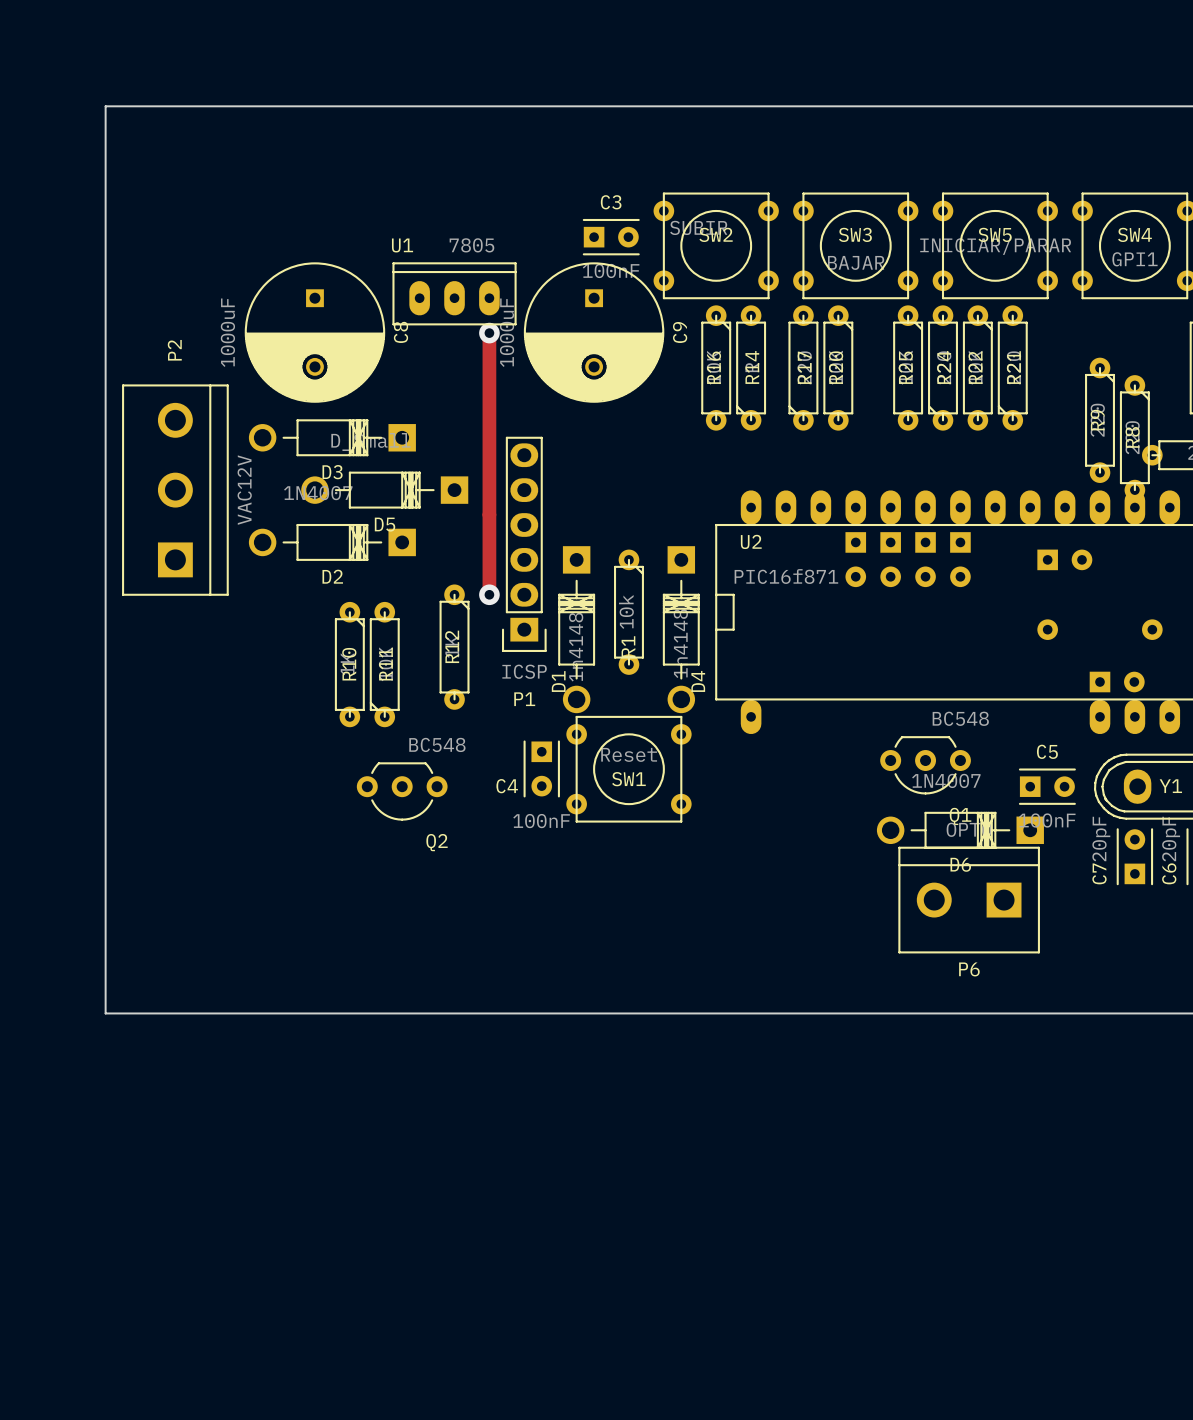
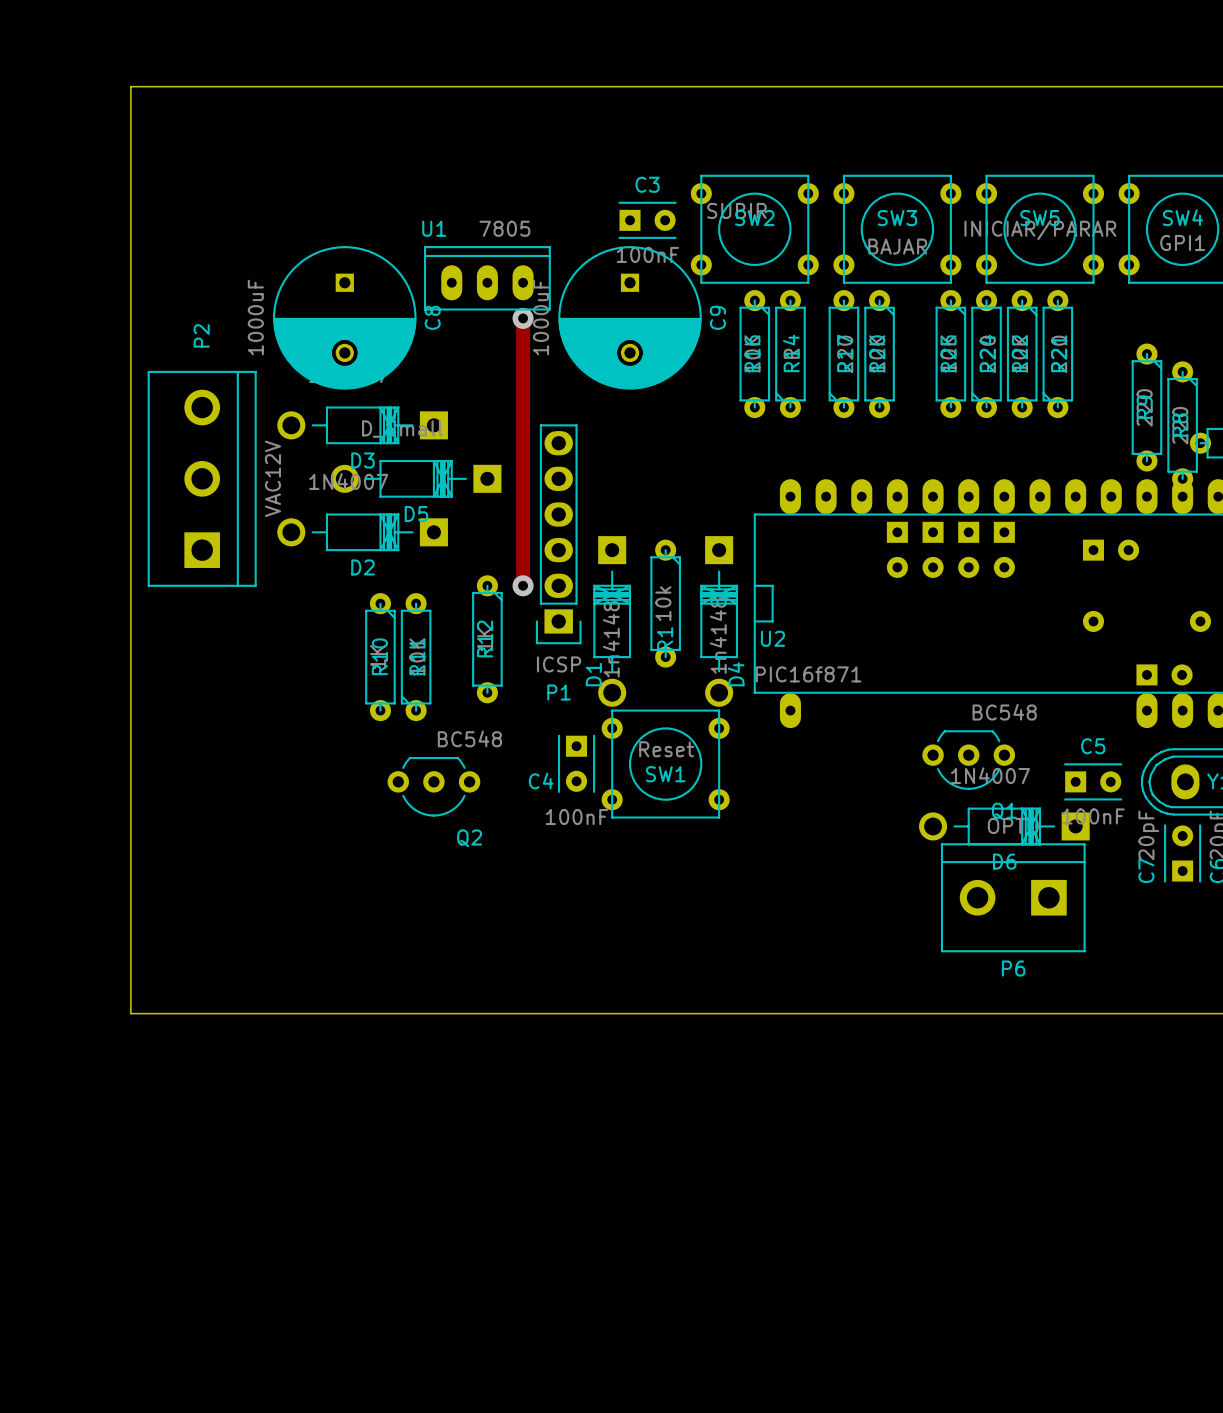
U2 name position: U2 (751, 541) -> U2 (772, 638)
U2 value position: PIC16f871 (786, 576) -> PIC16f871 (808, 674)

